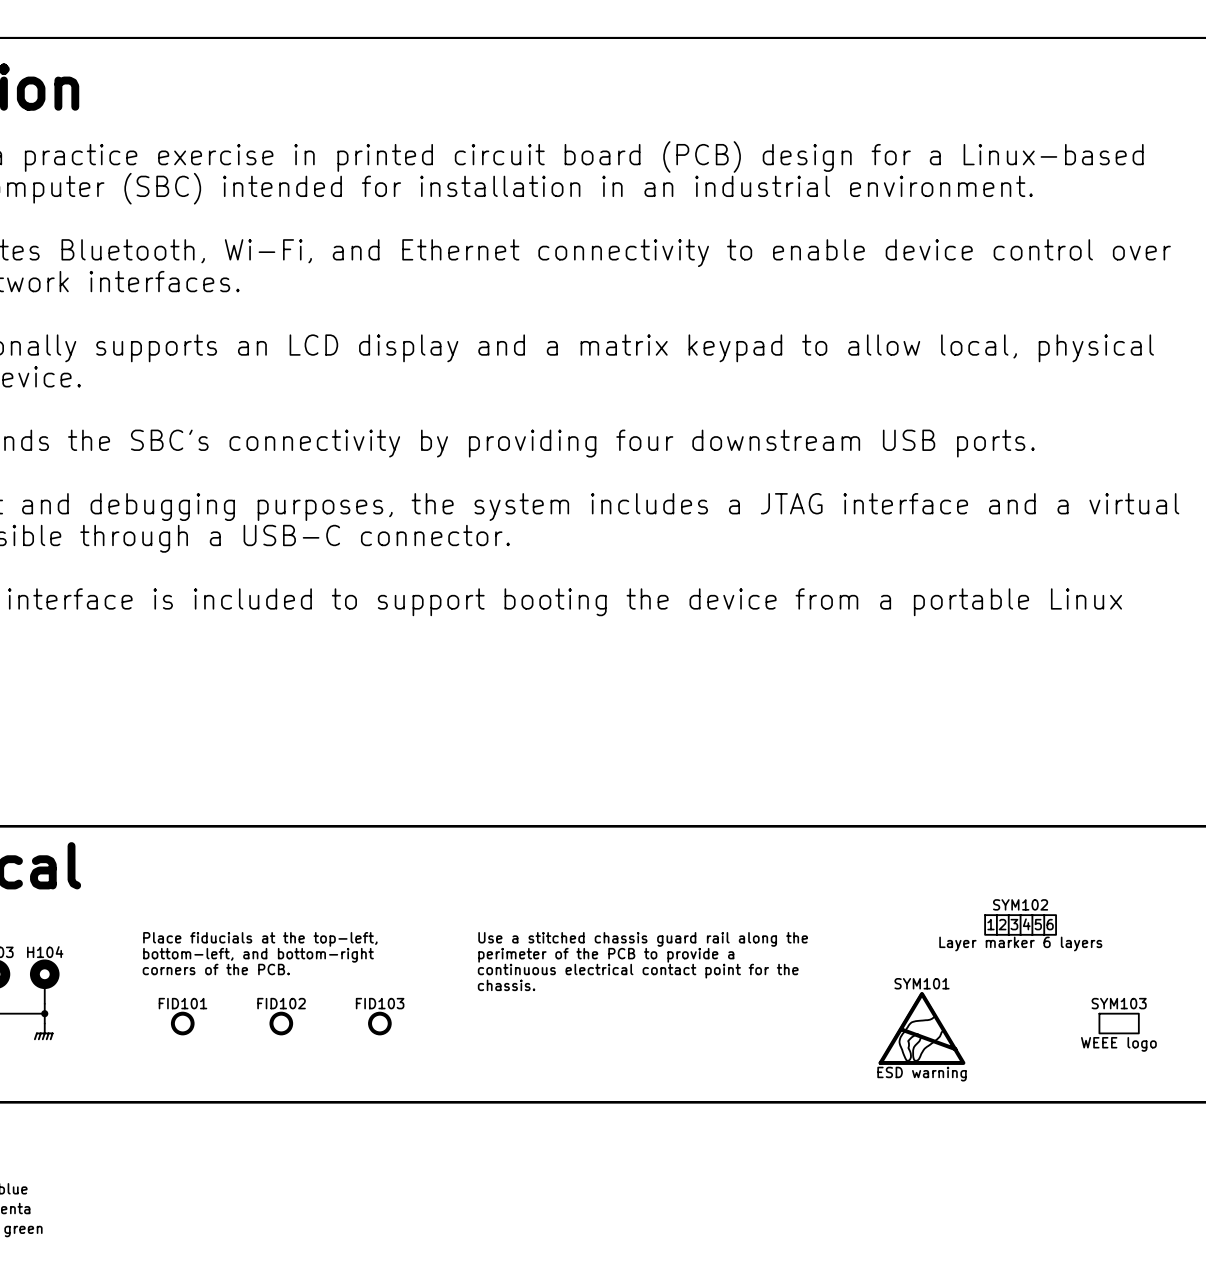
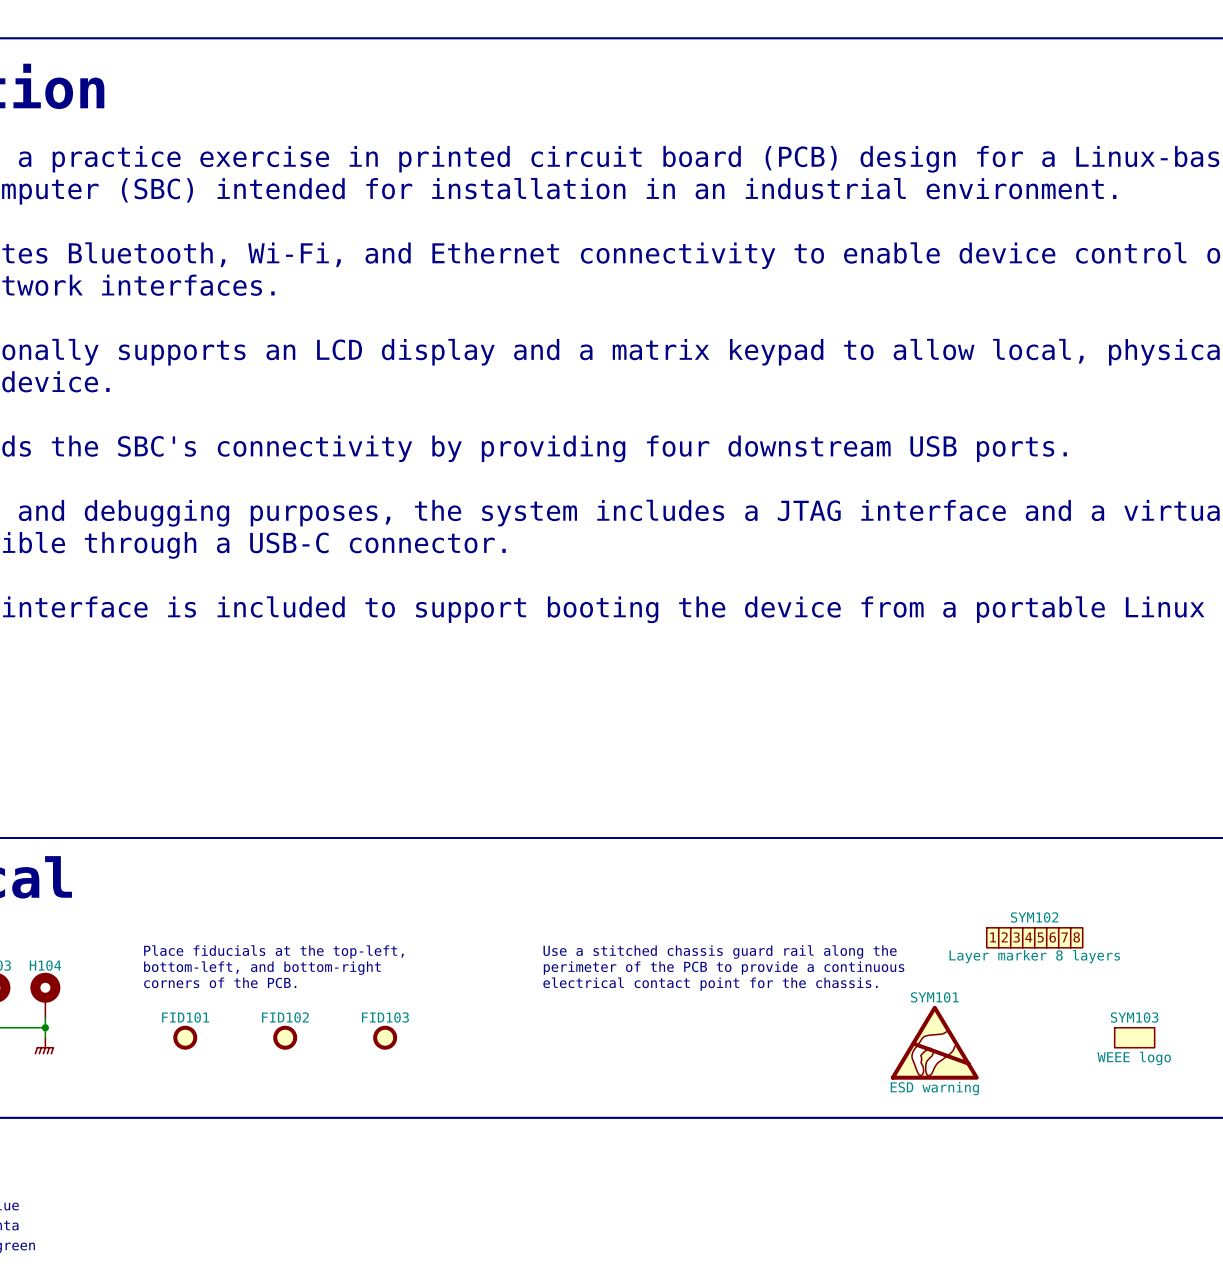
SYM102 symbol: [985, 915, 1057, 935] -> [986, 927, 1083, 948]
text position: Use a stitched chassis guard rail along the (643, 939) -> Use a stitched chassis guard rail along the (720, 951)
SYM102 value: Layer marker 6 layers (1020, 943) -> Layer marker 8 layers (1034, 956)
text: perimeter of the PCB to provide a (606, 955) -> perimeter of the PCB to provide a continuous (724, 968)
text: continuous electrical contact point for the (638, 971) -> electrical contact point for the chassis. (710, 984)
text: chassis. (506, 985) -> none

